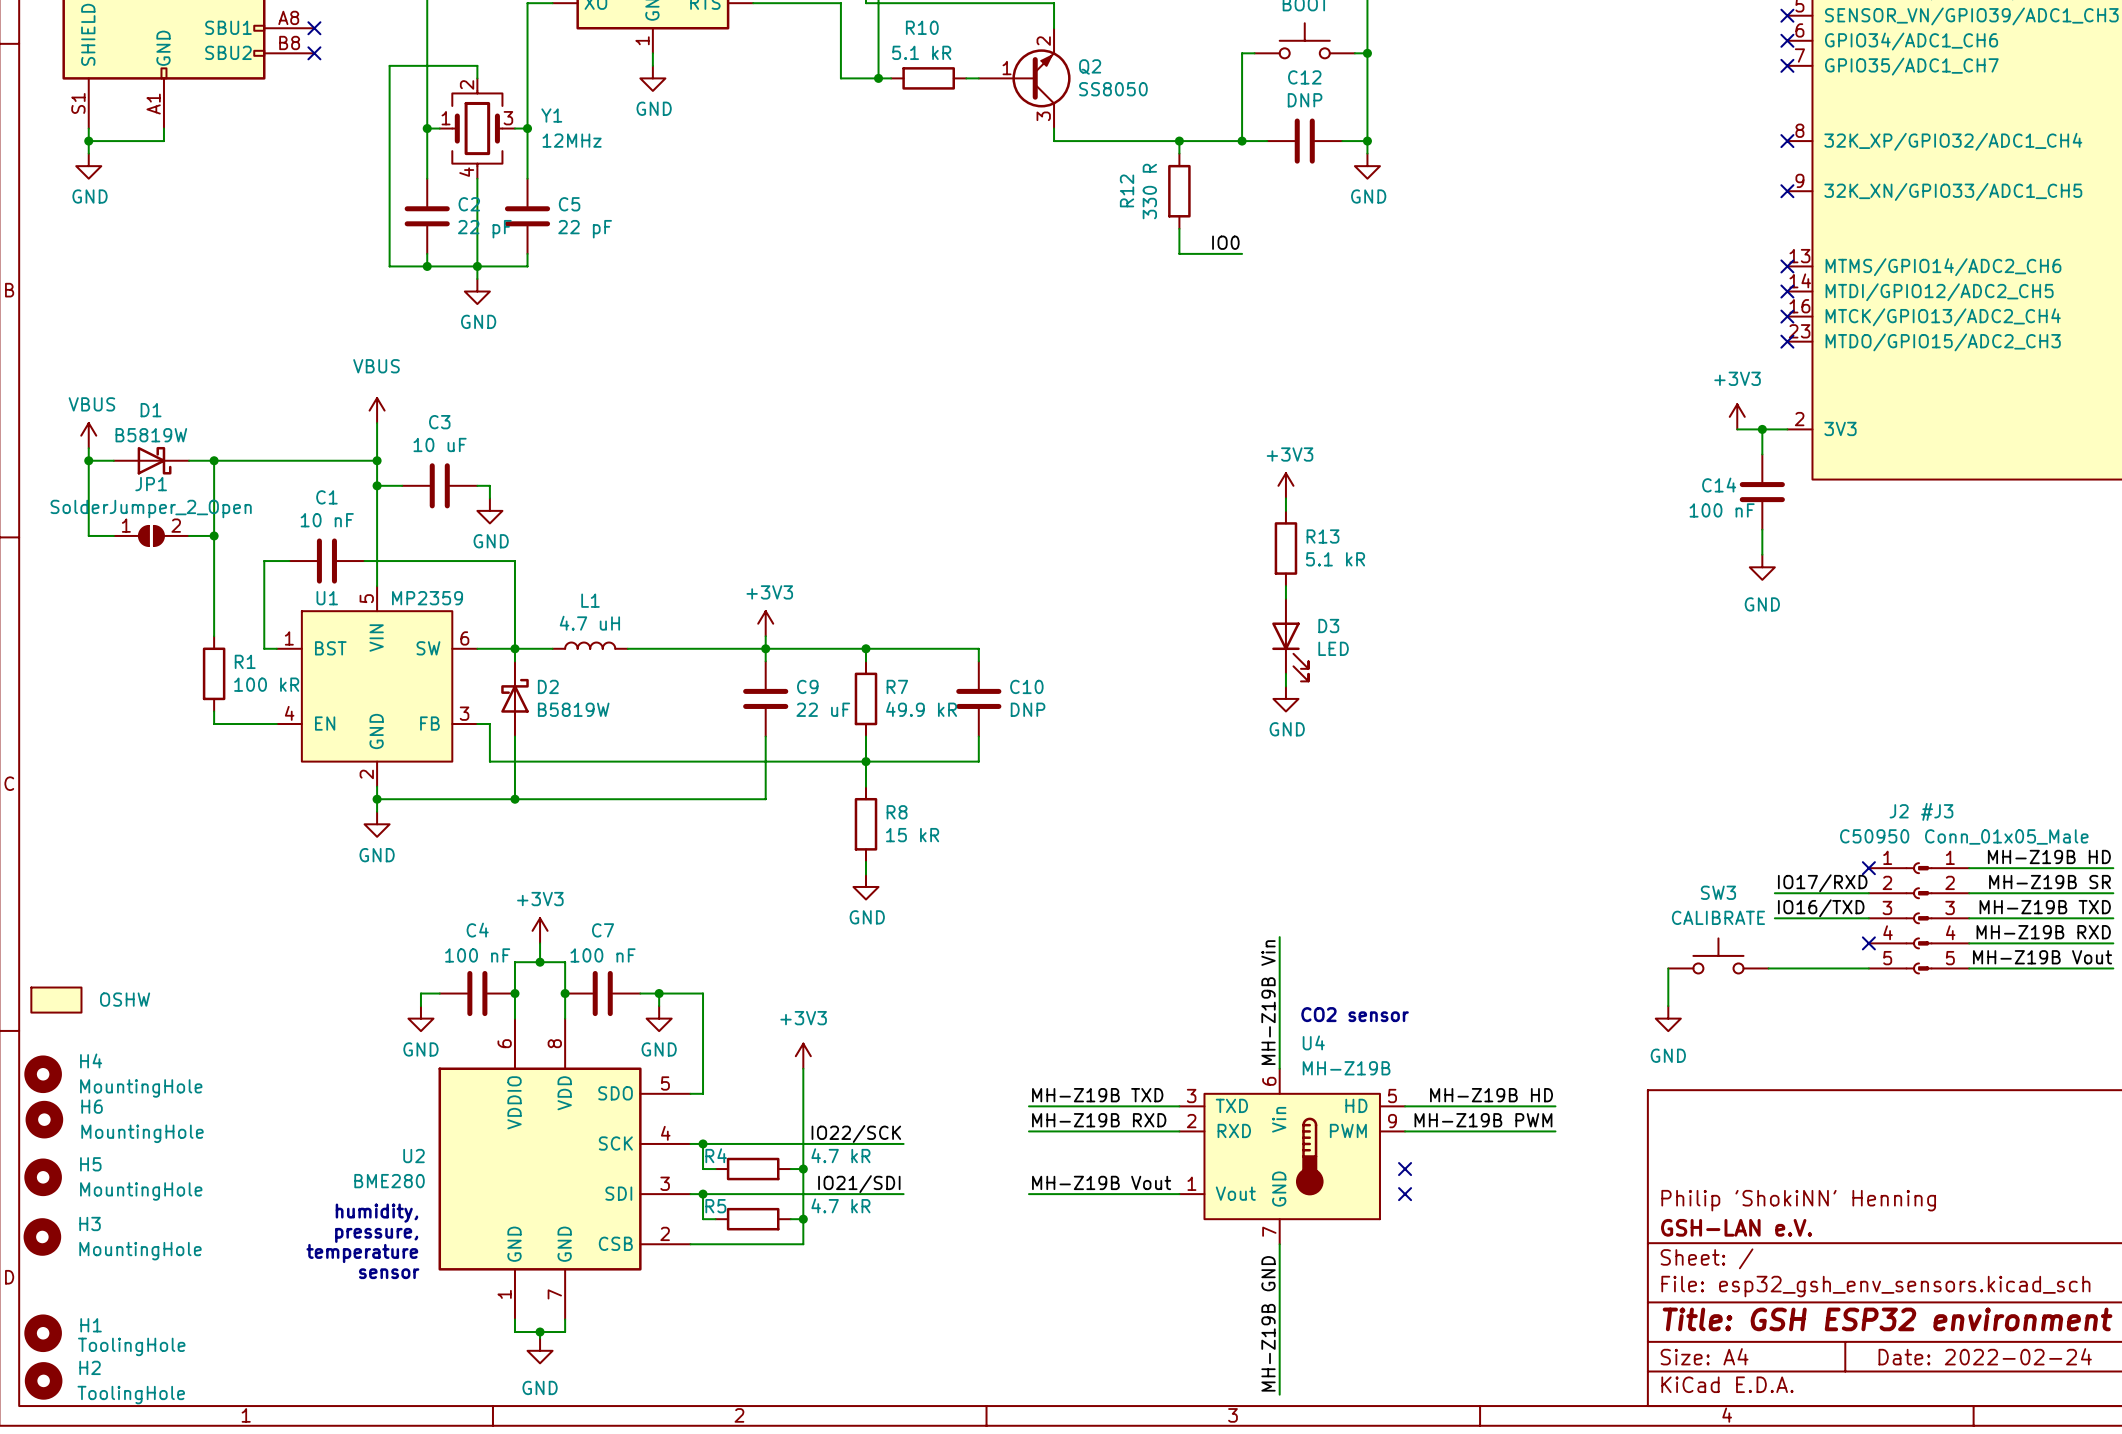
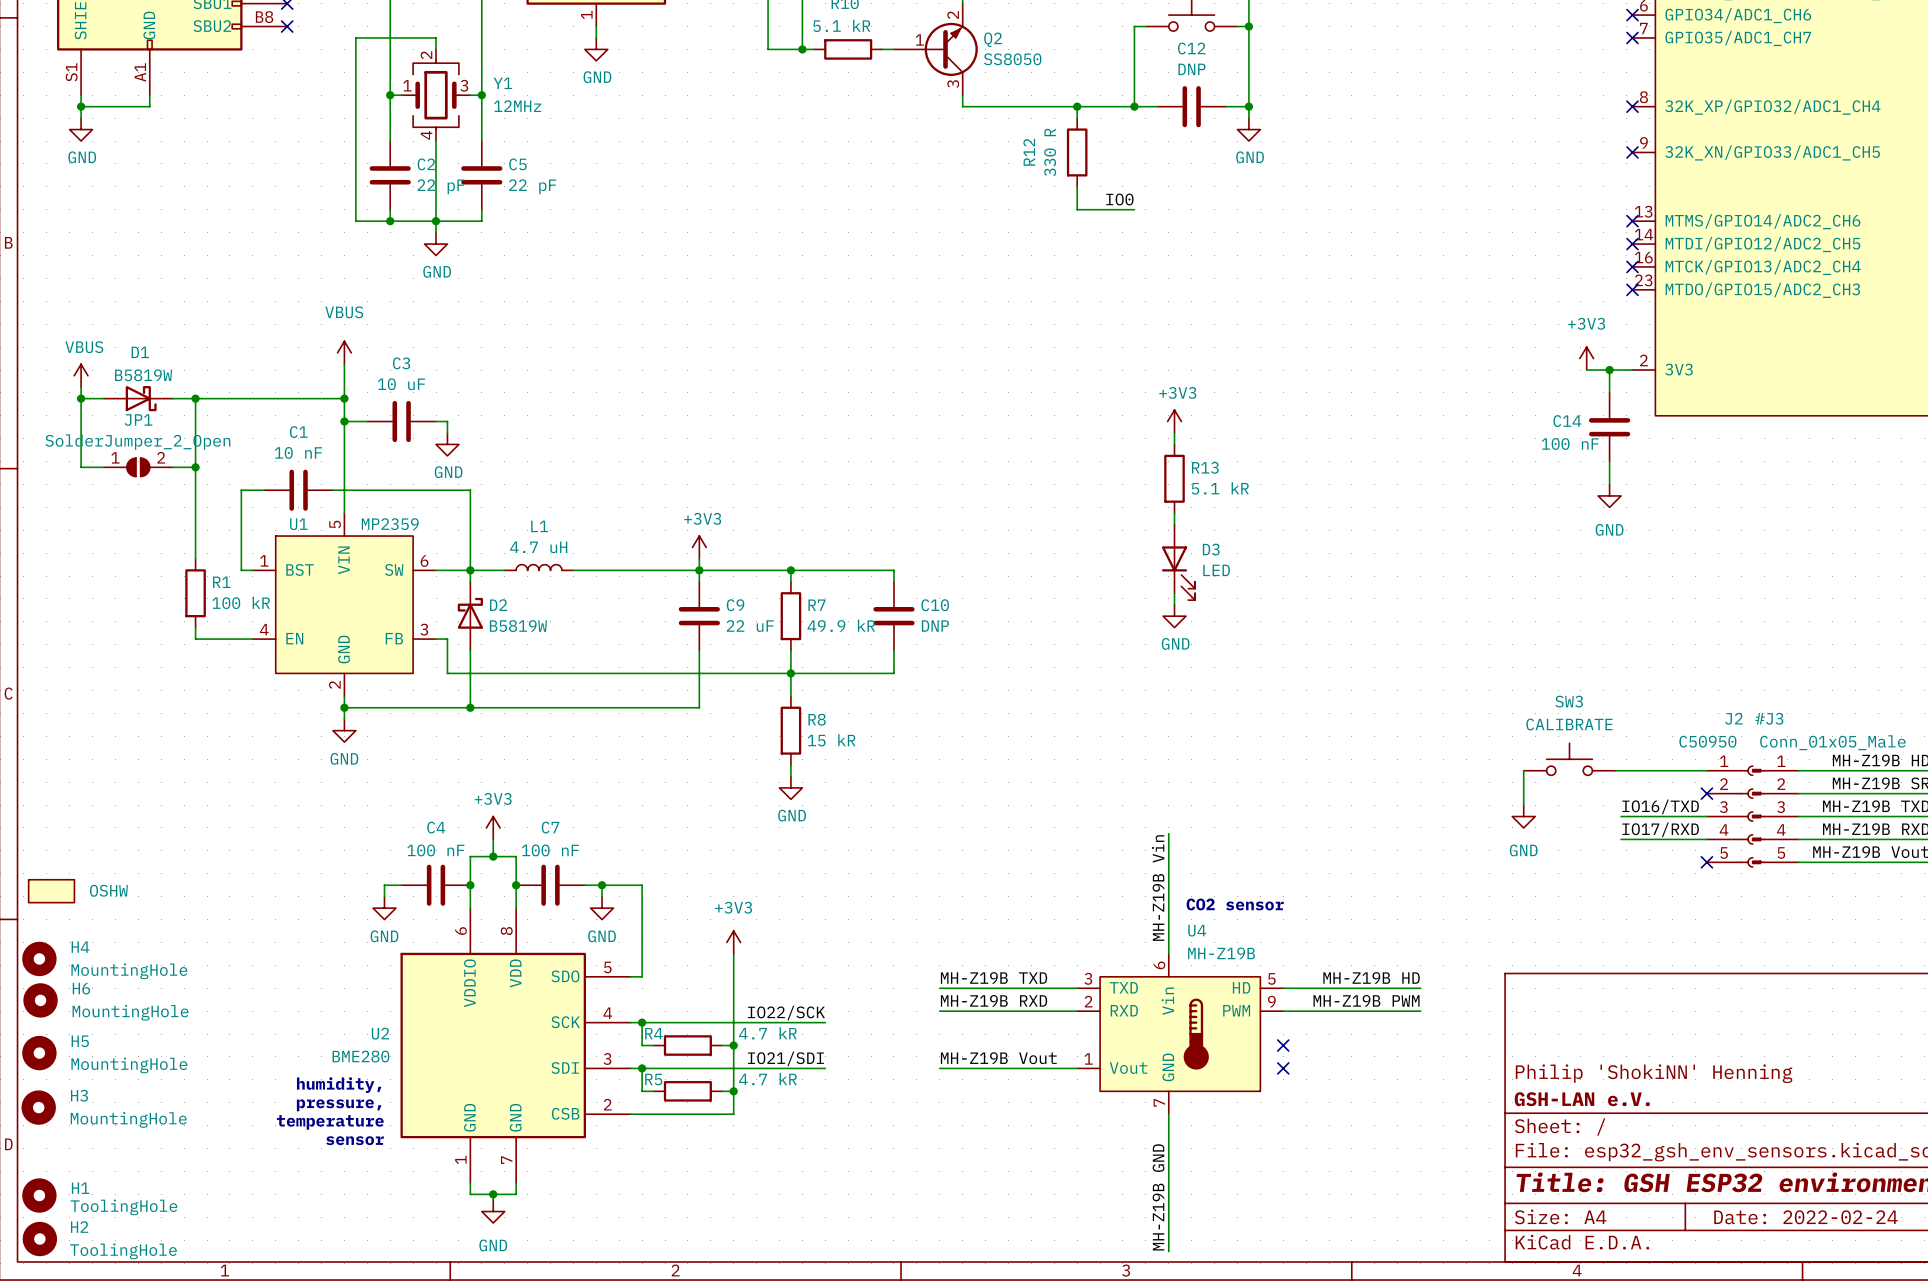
no-connect mark: (1868, 868) -> none
label position: IO17/RXD (1822, 883) -> IO17/RXD (1660, 829)
wire: (1774, 893) (1868, 893) -> (1621, 839) (1706, 839)
no-connect mark: none -> (1706, 793)
no-connect mark: (1868, 943) -> none
SW3 position: (1718, 955) -> (1569, 759)
wire: (1668, 968) (1668, 1006) -> (1523, 770) (1523, 805)
wire: (1768, 968) (1868, 968) -> (1615, 770) (1706, 770)
no-connect mark: none -> (1706, 862)
power symbol position: GND (1668, 1018) -> GND (1523, 816)

